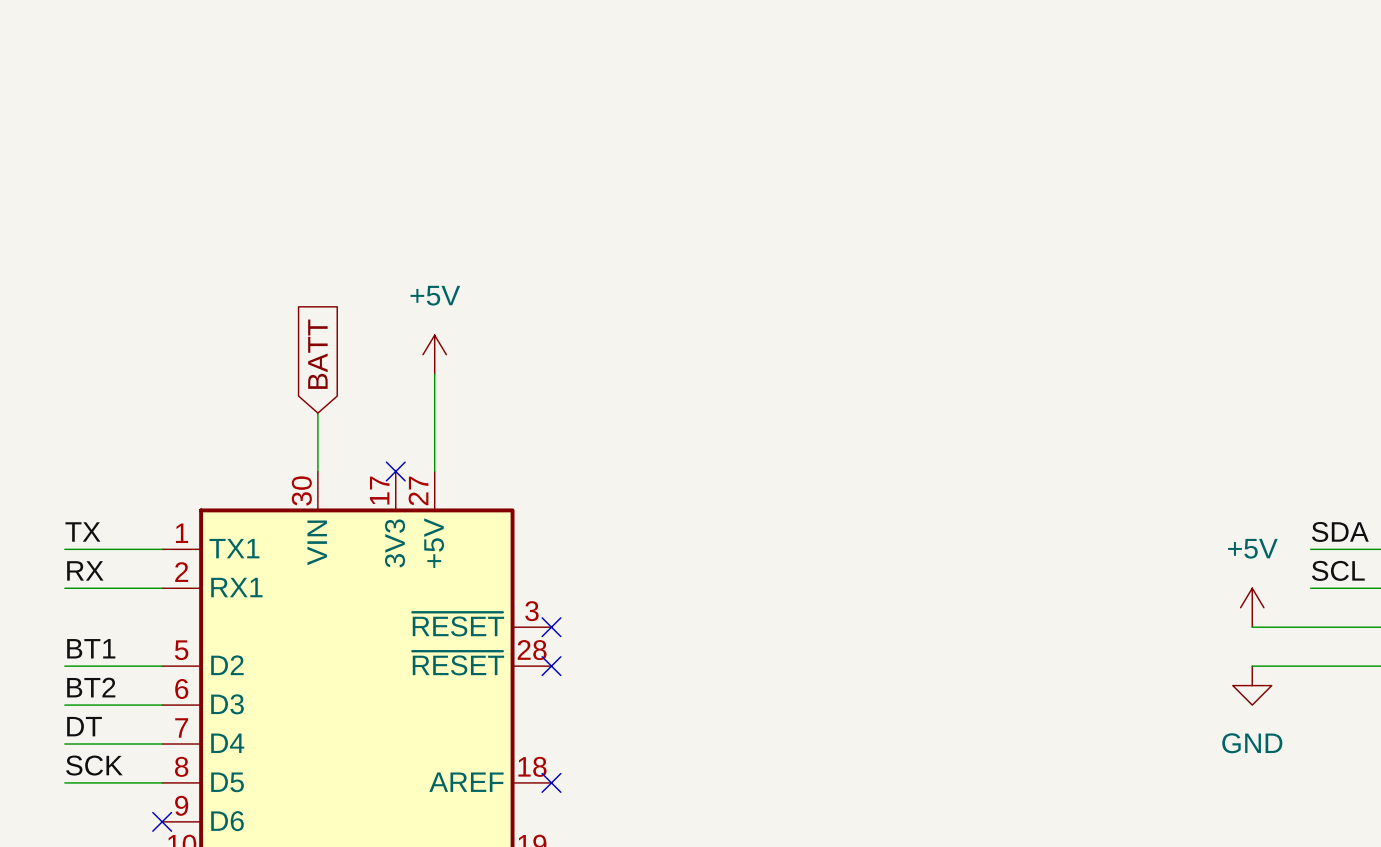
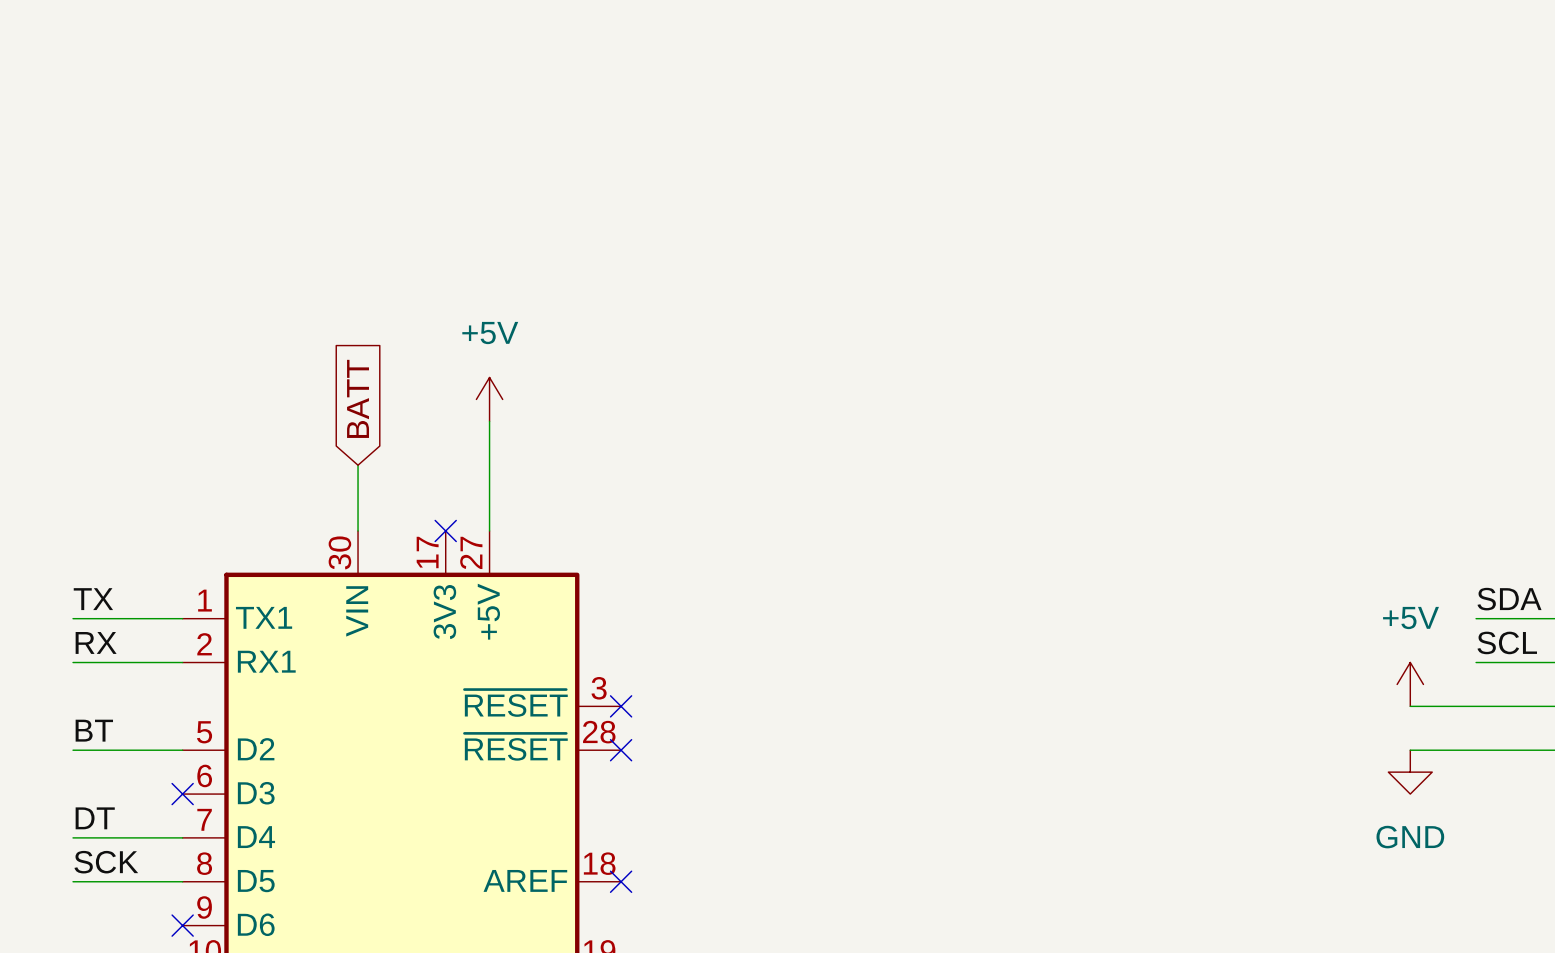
label: BT1 (91, 648) -> BT (94, 730)
label: BT2 (91, 687) -> none
wire: (64, 705) (162, 705) -> none
no-connect mark: none -> (182, 794)

